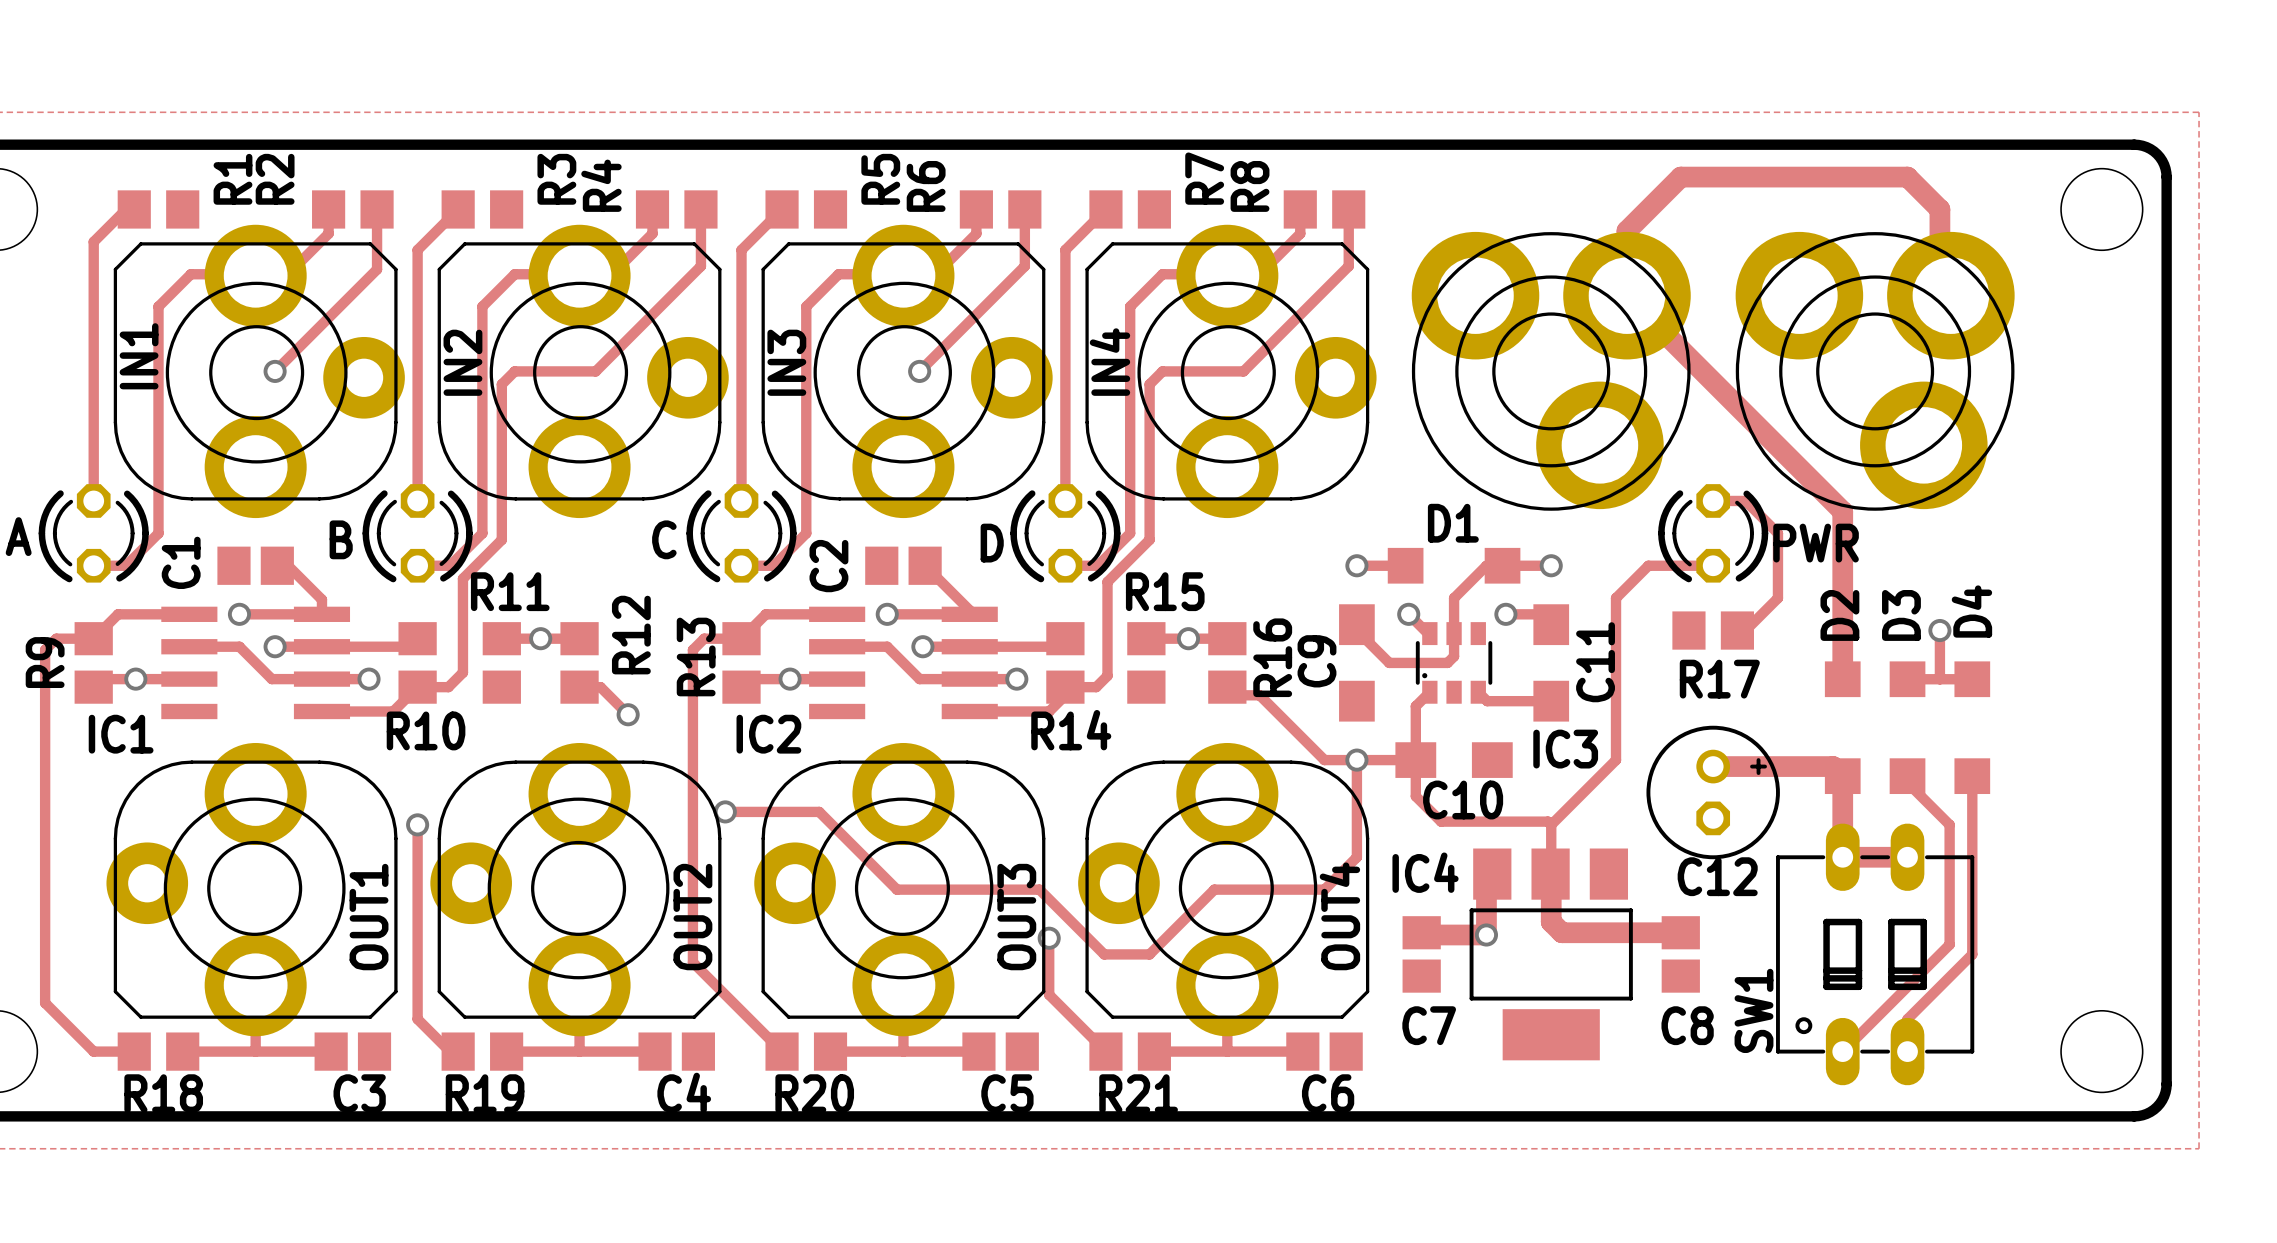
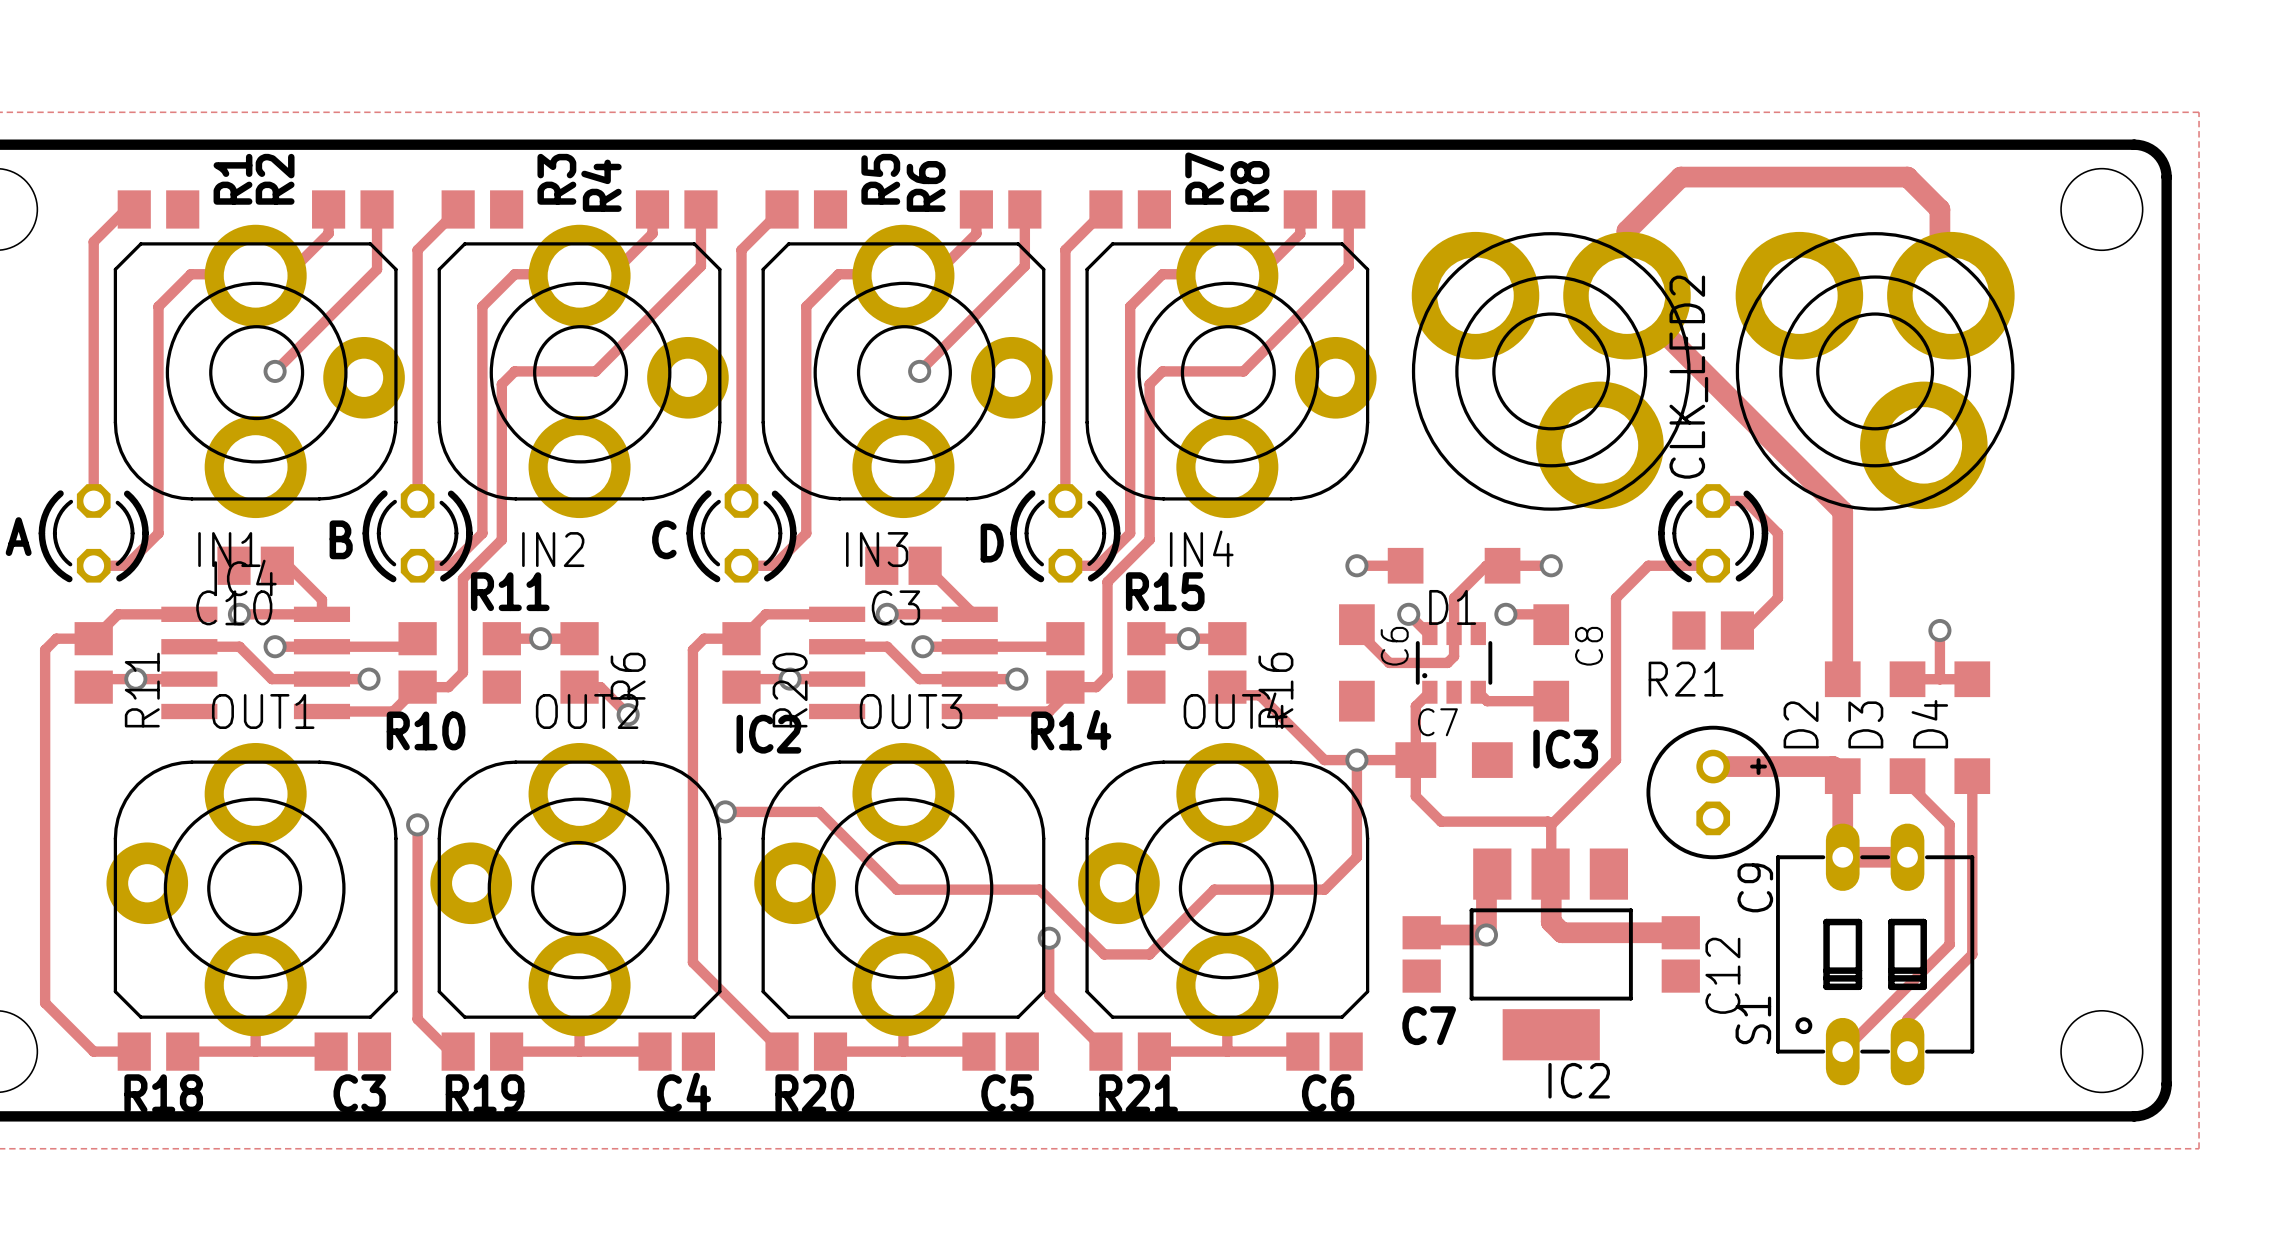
IN1 name rotation: 0° (139, 356) -> 90° clockwise (229, 549)
IN1 name position: IN1 (139, 356) -> IN1 (229, 549)
IN2 name rotation: 0° (462, 362) -> 90° clockwise (553, 549)
IN2 name position: IN2 (462, 362) -> IN2 (553, 549)
IN3 name rotation: 0° (786, 362) -> 90° clockwise (877, 549)
IN3 name position: IN3 (786, 362) -> IN3 (877, 549)
IN4 name rotation: 0° (1109, 362) -> 90° clockwise (1201, 548)
IN4 name position: IN4 (1109, 362) -> IN4 (1201, 548)
D1 name position: D1 (1453, 523) -> D1 (1452, 607)
PWR name: PWR (1816, 543) -> CLK_LED2 (1688, 377)
C1 name: C1 (181, 562) -> C10 (234, 607)
C2 name: C2 (828, 566) -> C3 (895, 607)
D4 name position: D4 (1971, 611) -> D4 (1929, 724)
D2 name position: D2 (1839, 615) -> D2 (1801, 724)
D3 name position: D3 (1901, 615) -> D3 (1865, 724)
R12 name: R12 (631, 635) -> R6 (628, 676)
R13 name: R13 (696, 657) -> R20 (790, 690)
R16 name position: R16 (1272, 657) -> R16 (1275, 690)
C9 name: C9 (1316, 661) -> C6 (1394, 646)
R9 name: R9 (45, 662) -> R11 (142, 690)
C11 name: C11 (1595, 662) -> C8 (1589, 646)
R17 name: R17 (1719, 679) -> R21 (1686, 679)
IC1 name: IC1 (121, 734) -> IC4 (245, 577)
C10 name: C10 (1463, 800) -> C7 (1437, 722)
IC4 name: IC4 (1425, 872) -> IC2 (1579, 1080)
C12 name: C12 (1717, 876) -> C9 (1755, 887)
OUT4 name rotation: 0° (1339, 916) -> 90° clockwise (1235, 710)
OUT4 name position: OUT4 (1339, 916) -> OUT4 (1235, 710)
OUT1 name rotation: 0° (369, 917) -> 90° clockwise (263, 711)
OUT1 name position: OUT1 (369, 917) -> OUT1 (263, 711)
OUT2 name rotation: 0° (692, 917) -> 90° clockwise (587, 711)
OUT2 name position: OUT2 (692, 917) -> OUT2 (587, 711)
OUT3 name rotation: 0° (1016, 917) -> 90° clockwise (911, 711)
OUT3 name position: OUT3 (1016, 917) -> OUT3 (911, 711)
SW1 name: SW1 (1753, 1010) -> S1 (1753, 1020)
C8 name: C8 (1687, 1025) -> C12 (1722, 975)

